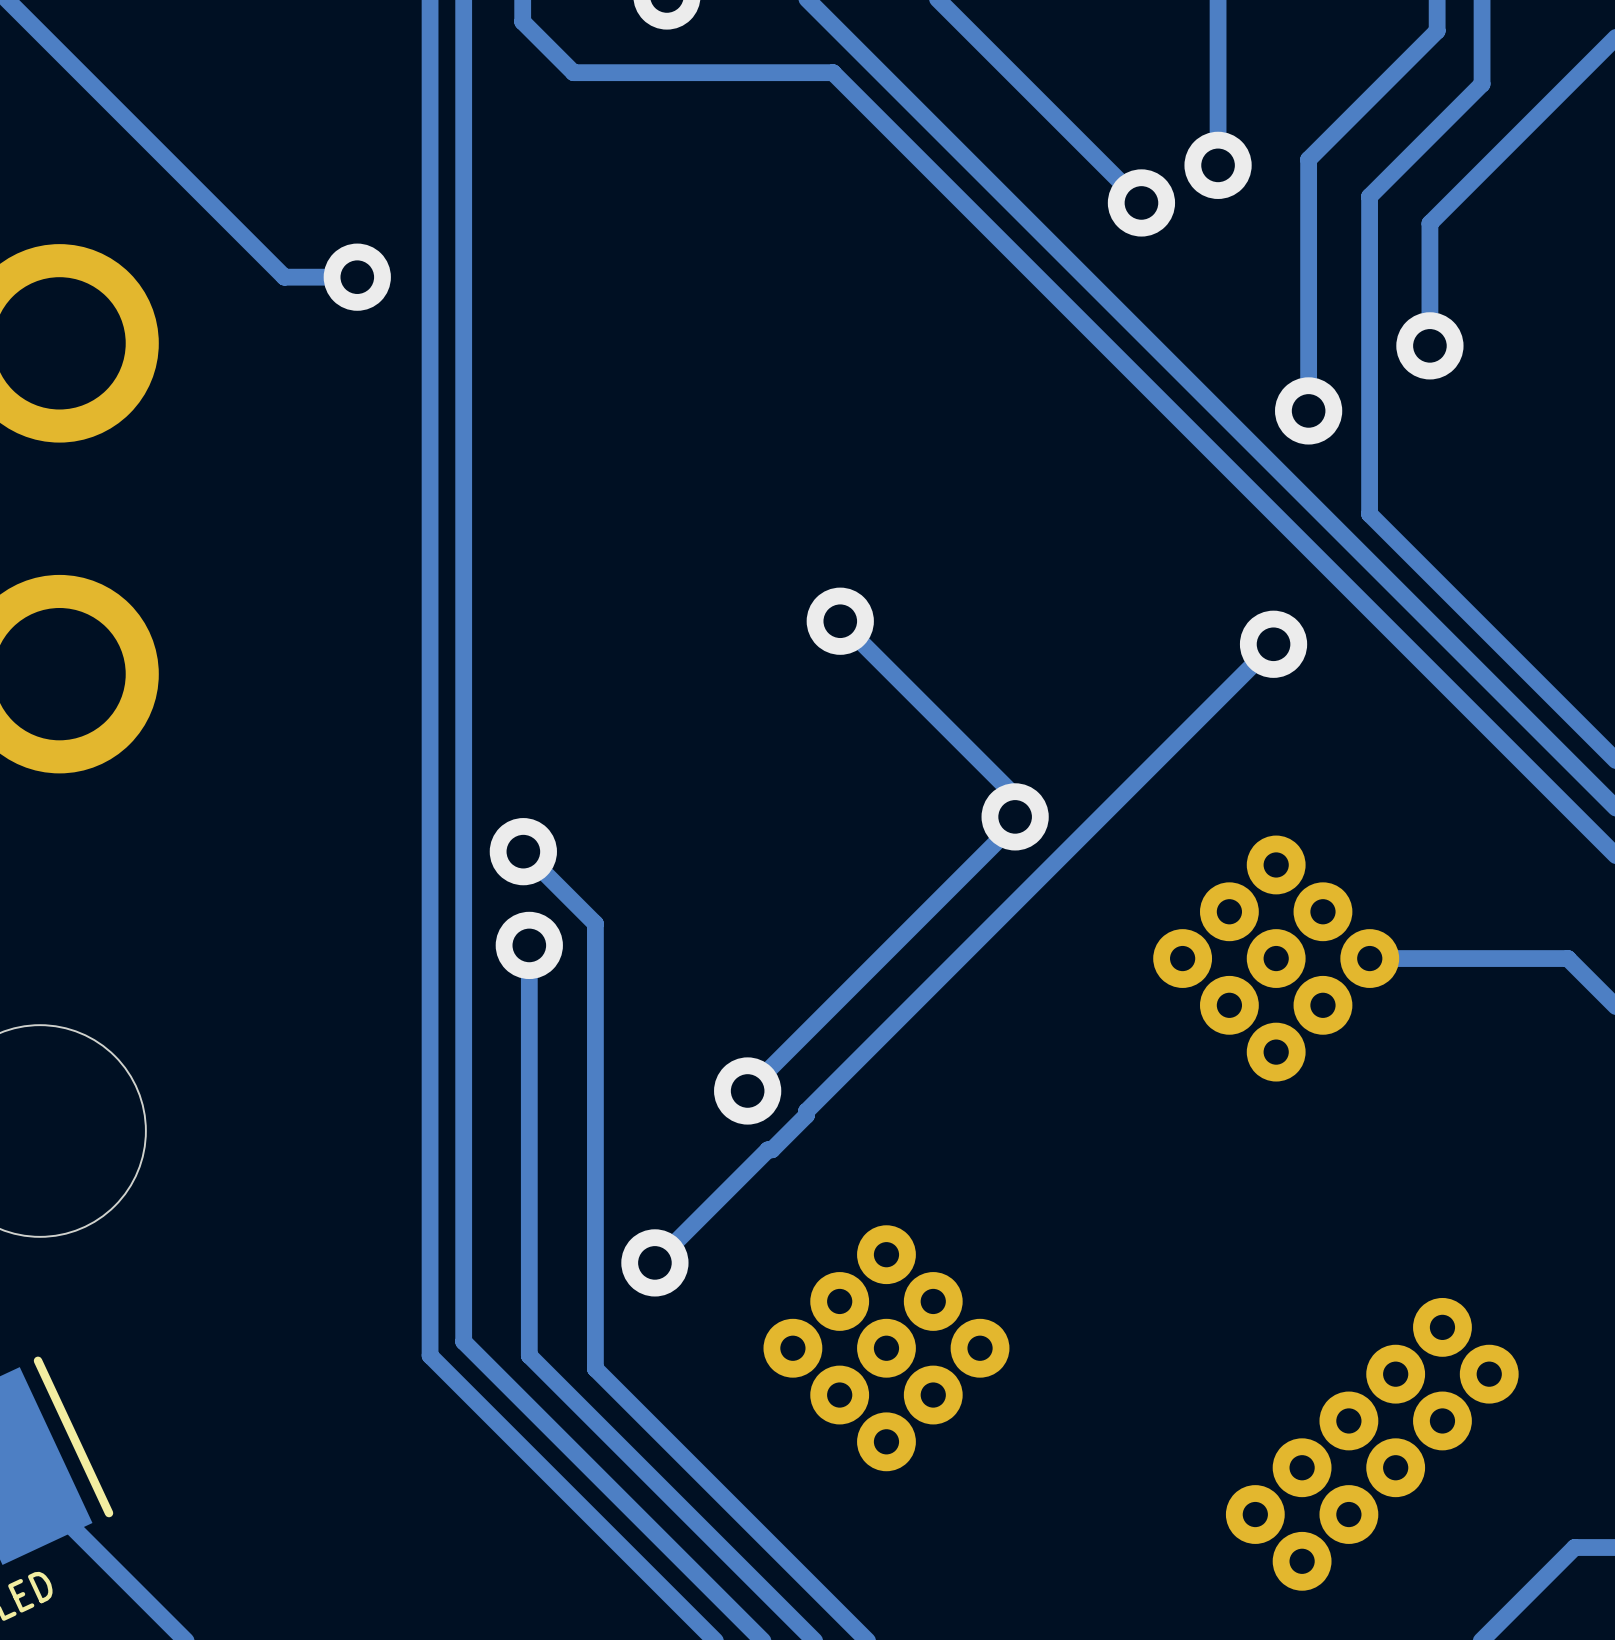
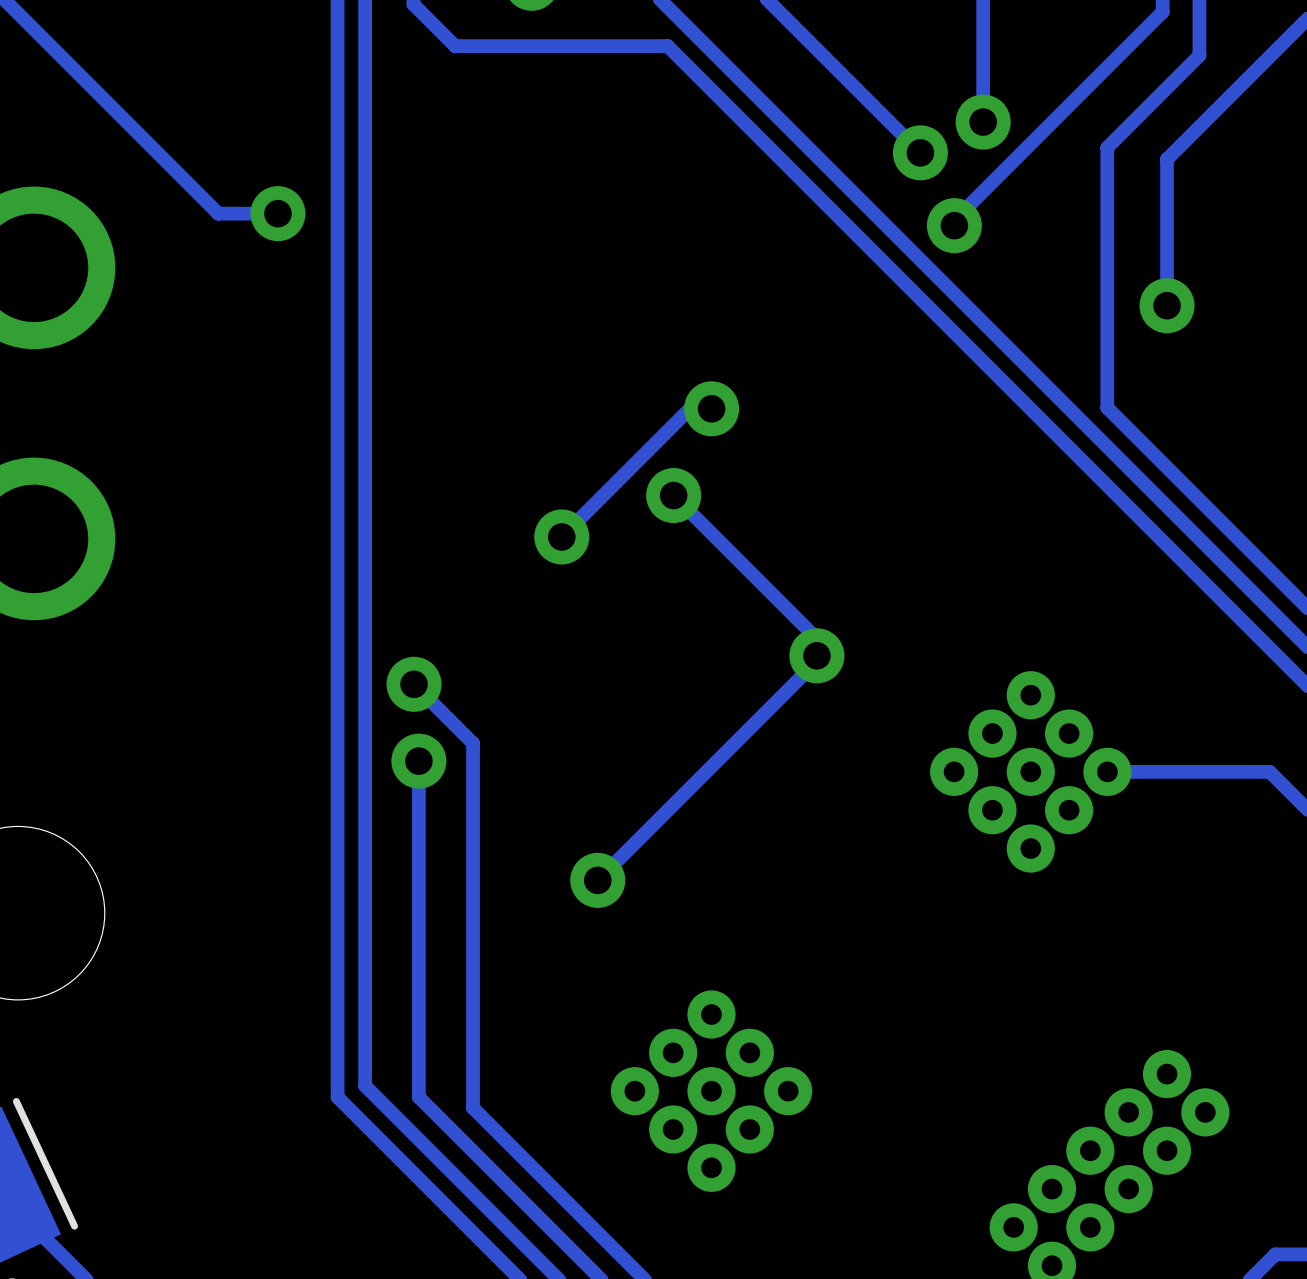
track: (1308, 159) (1308, 410) -> (1057, 117) (954, 220) (954, 225)
track: (1442, 210) (1429, 223) (1429, 345) -> (1167, 159) (1167, 305)
via: none -> (954, 225)
via position: (1429, 345) -> (1167, 305)
via: (1308, 410) -> none
track: none -> (711, 408) (689, 408) (561, 536)
via: none -> (711, 408)
track: (1273, 644) (806, 1111) (806, 1115) (772, 1149) (768, 1149) (654, 1262) -> none
via: (1273, 644) -> none
via: none -> (561, 536)
via: (654, 1262) -> none

